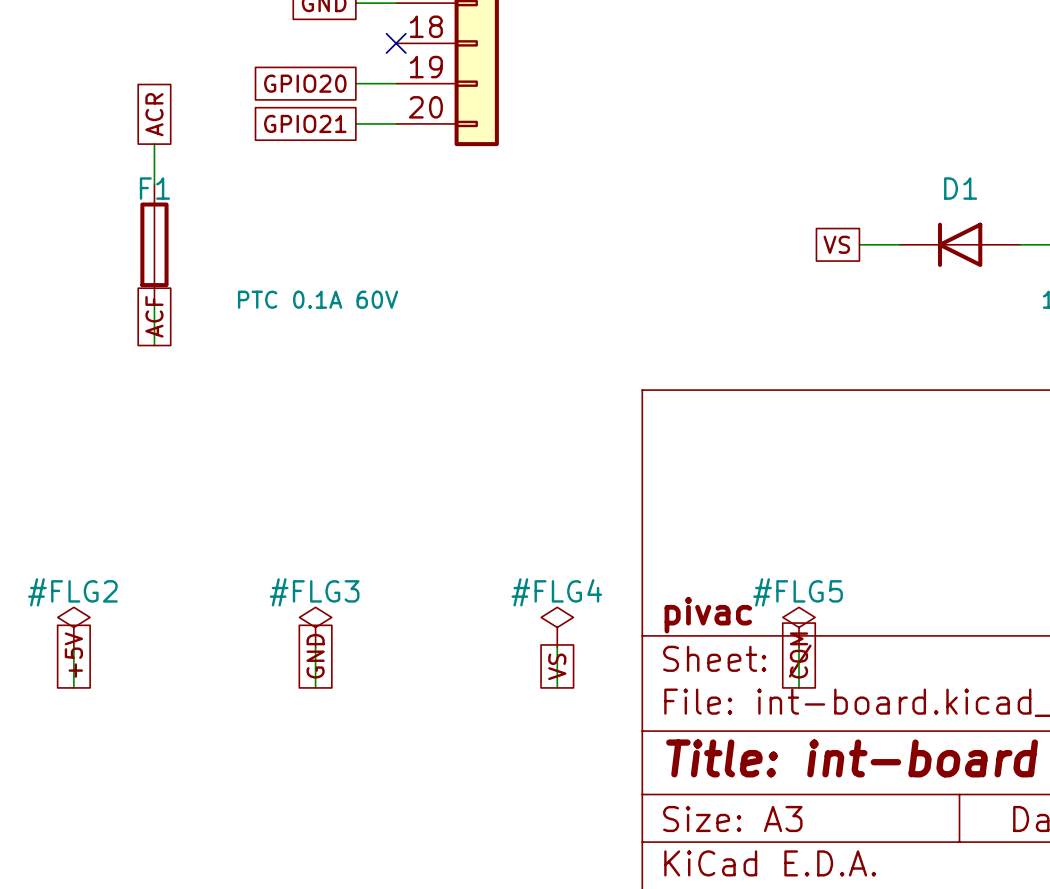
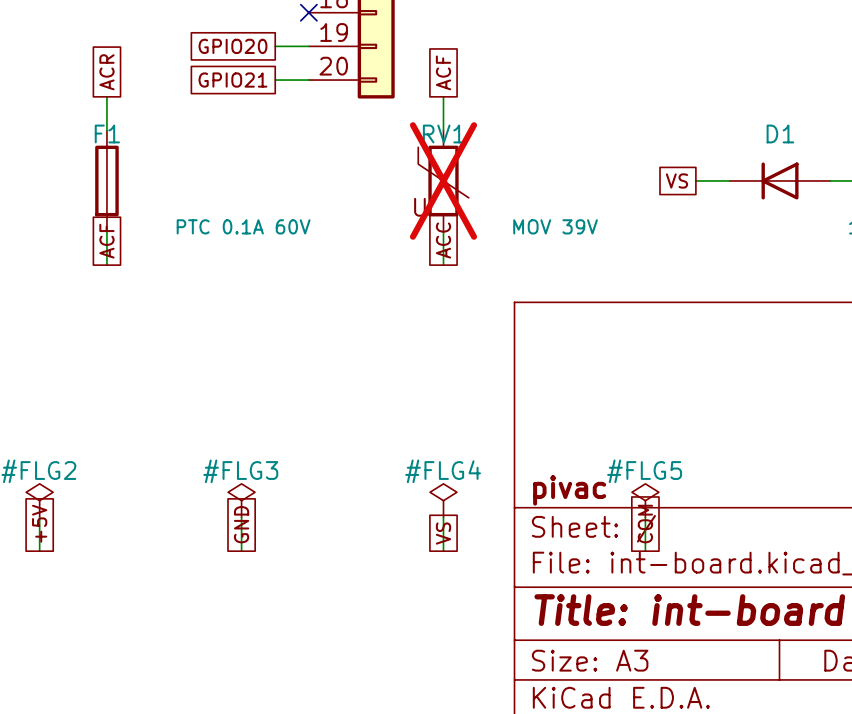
global label: none -> ACF (443, 72)
wire: none -> (443, 96) (443, 130)
RV1: none -> MOV 39V (443, 180)
wire: none -> (443, 231) (443, 265)
global label: none -> ACC (443, 240)

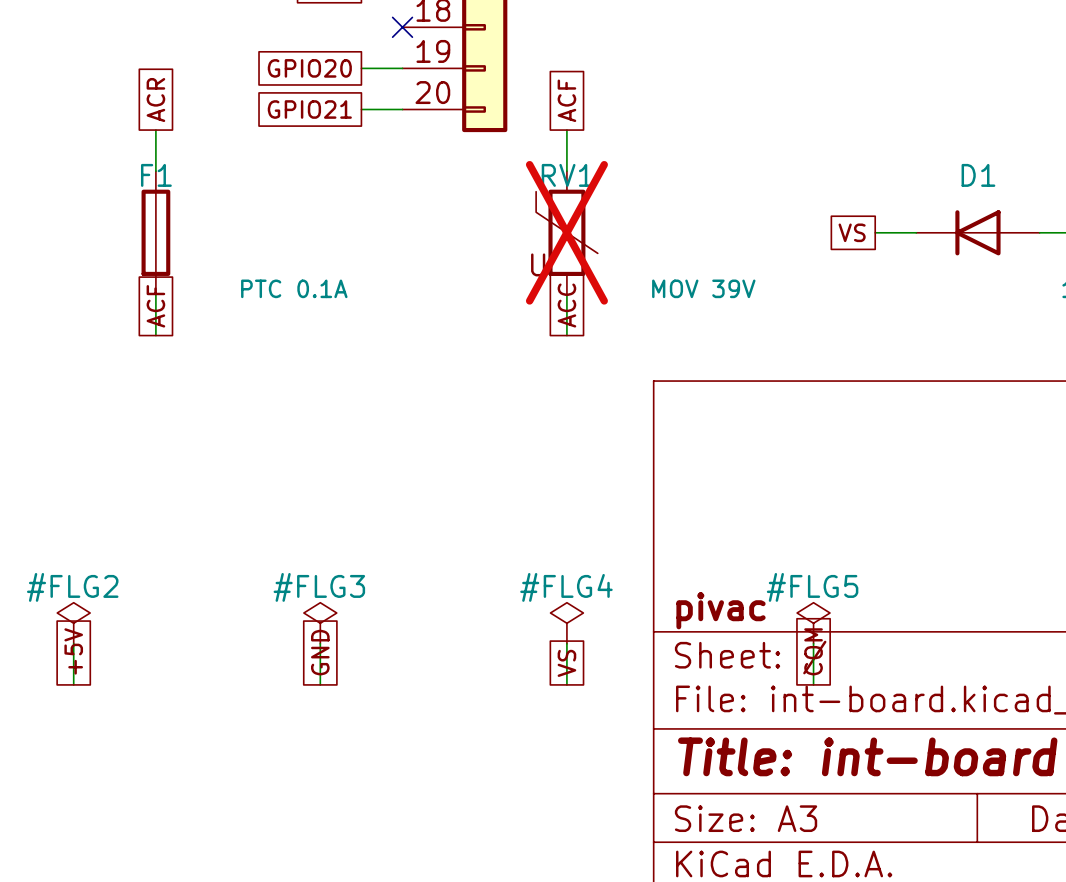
F1 value: PTC 0.1A 60V (243, 226) -> PTC 0.1A (294, 288)

